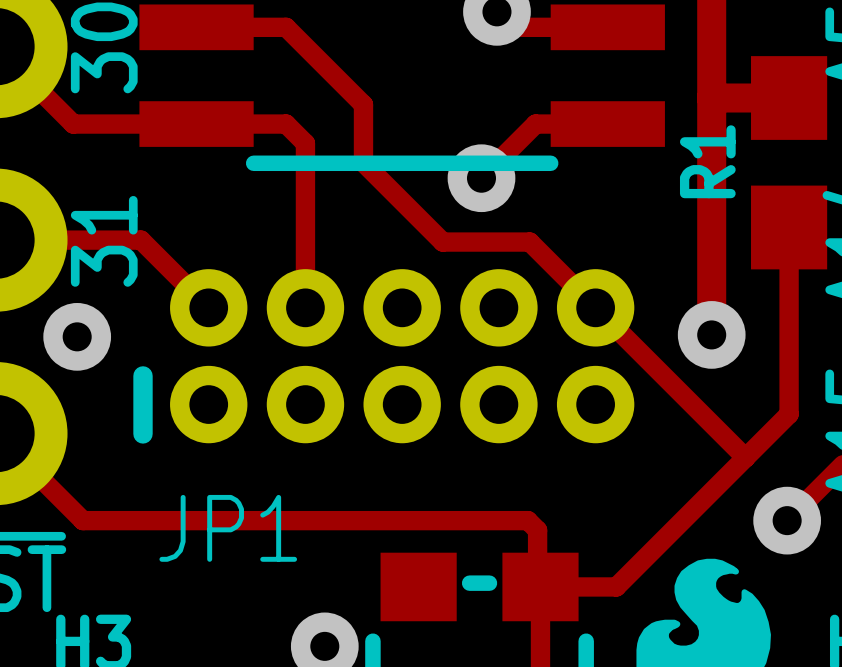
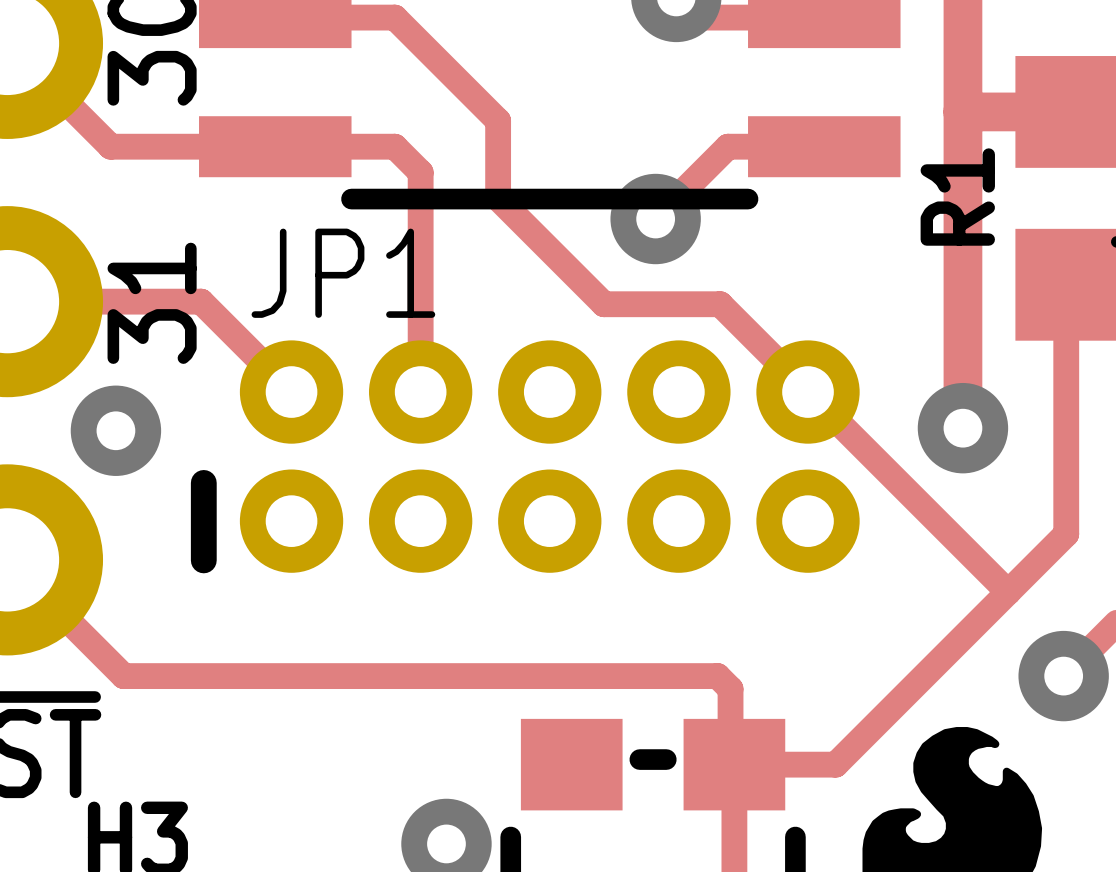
JP1 name position: JP1 (228, 528) -> JP1 (343, 273)

